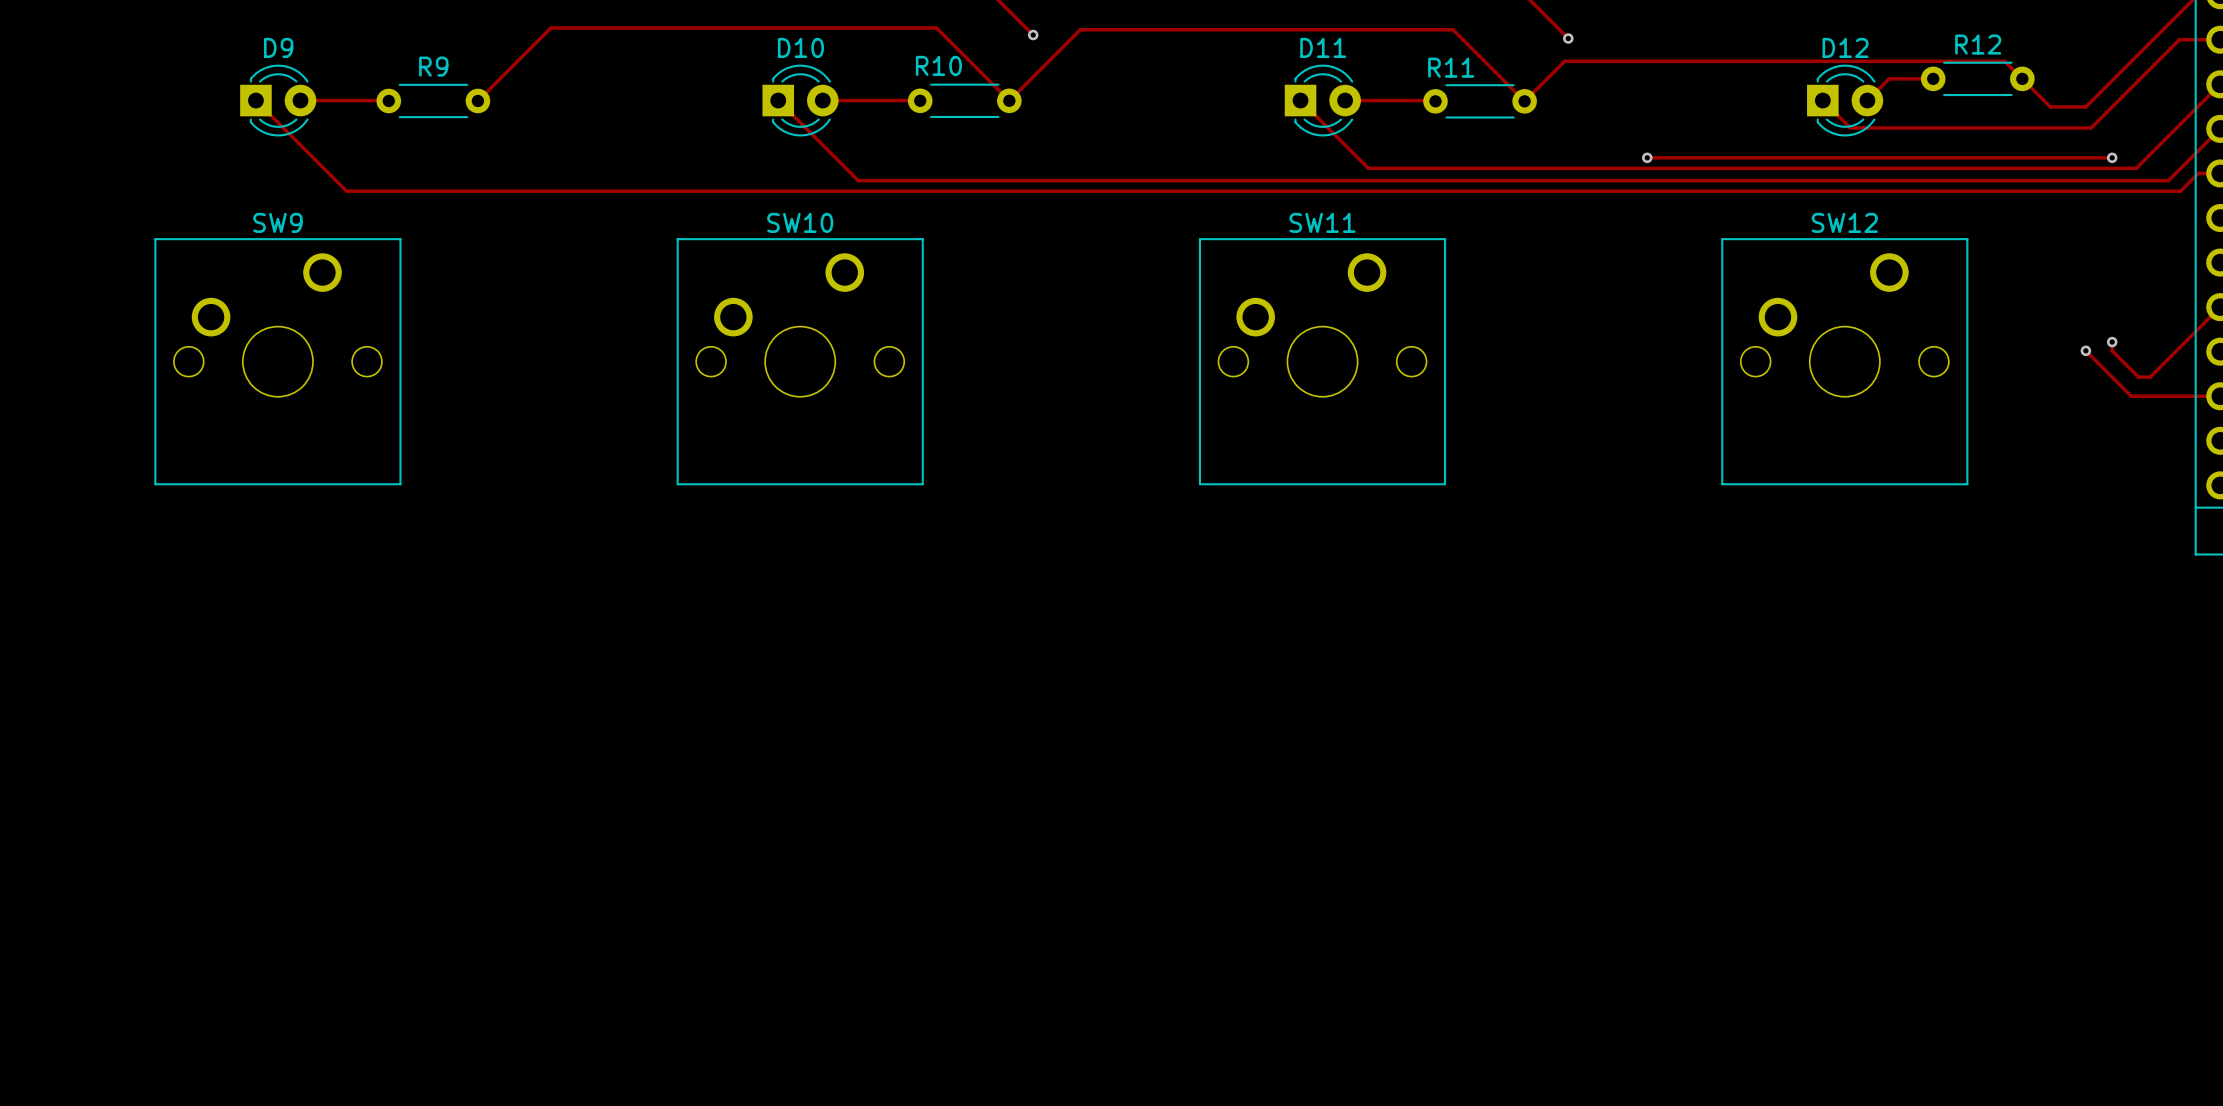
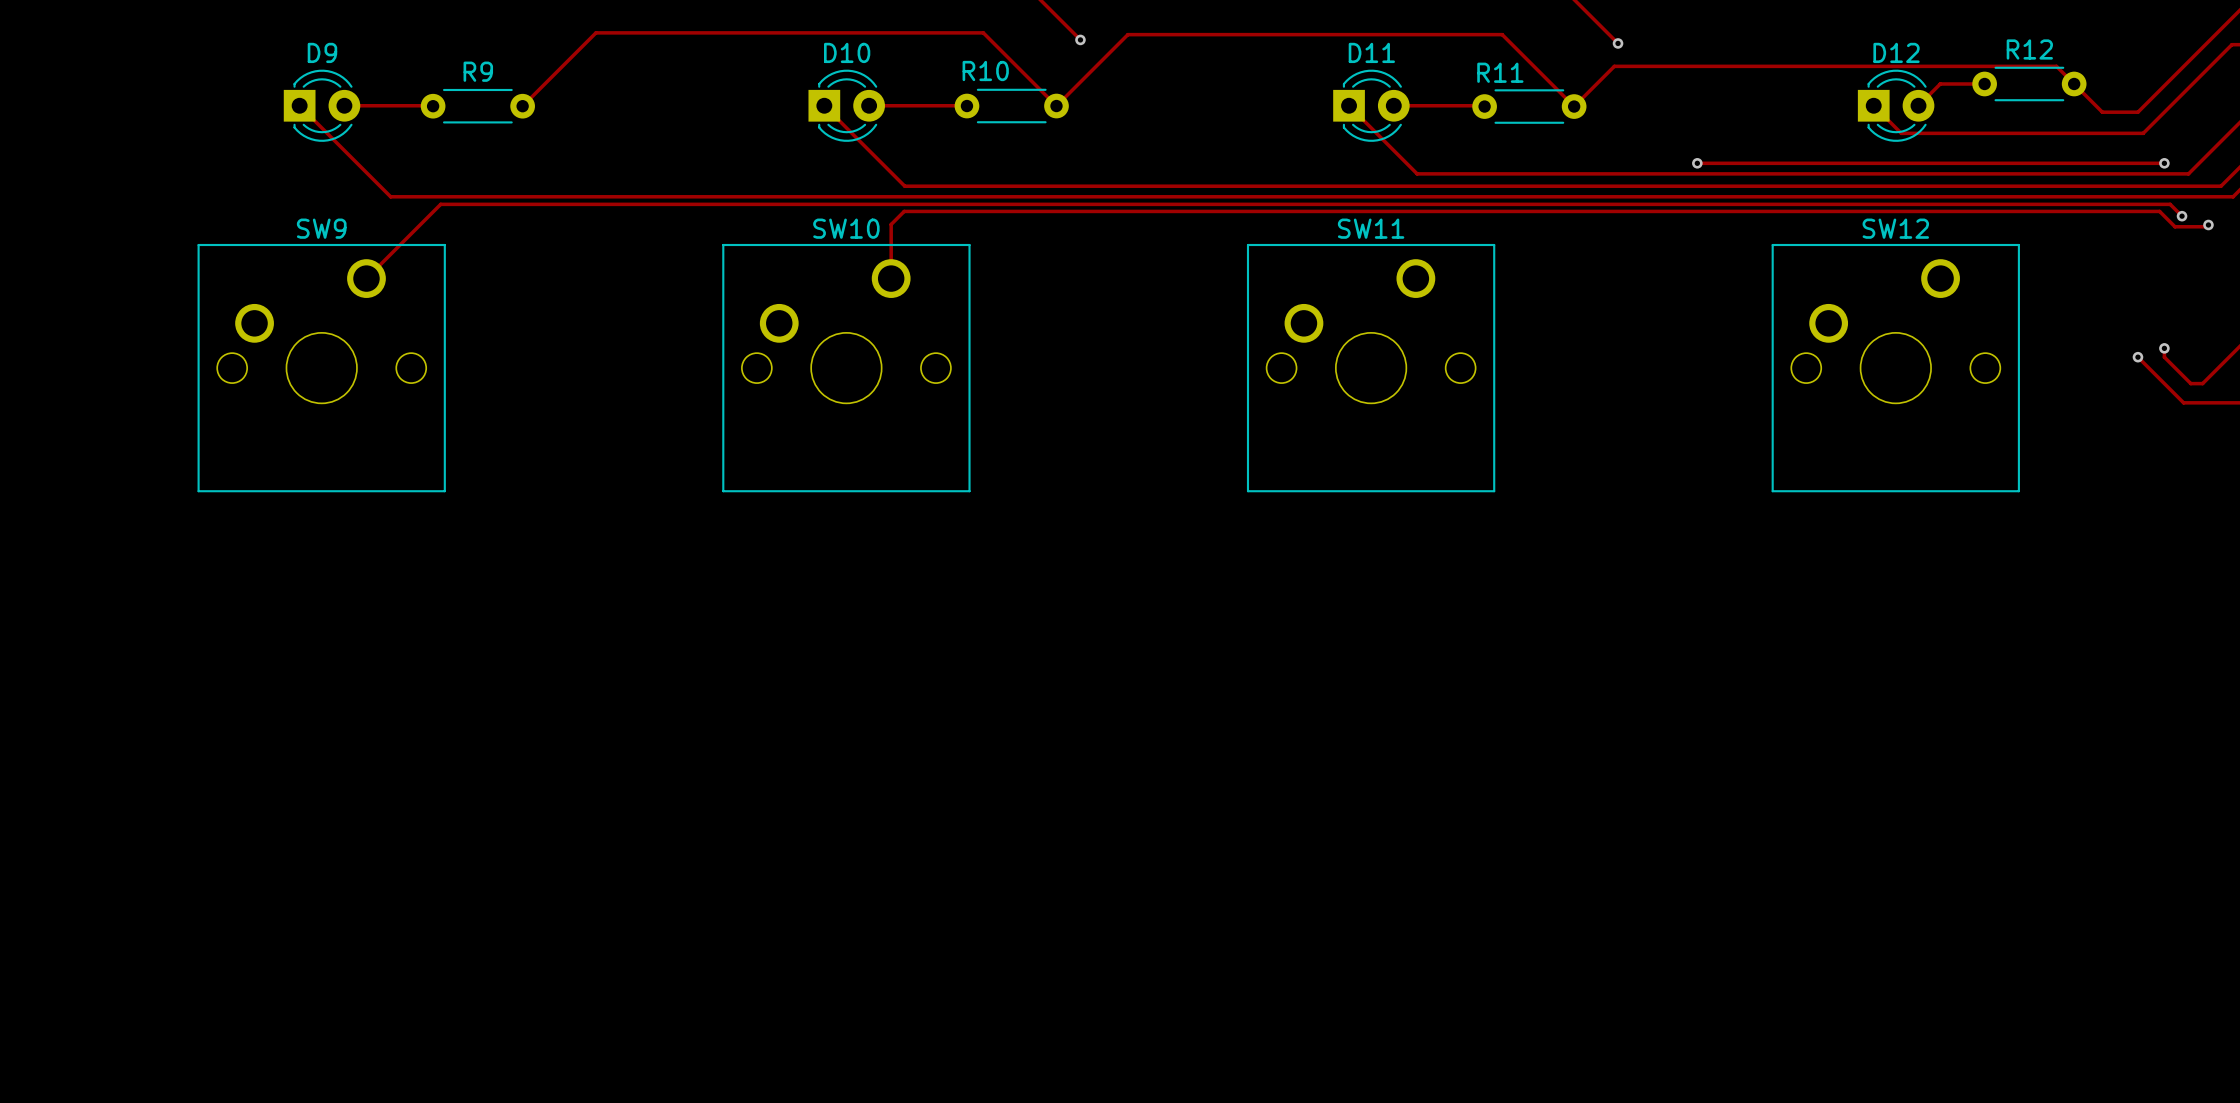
track: none -> (2182, 216) (2170, 204) (440, 204) (366, 278)
via: none -> (2182, 216)
track: none -> (2208, 224) (2206, 226) (2175, 226) (2159, 211) (904, 211) (891, 224) (891, 278)
via: none -> (2208, 224)

